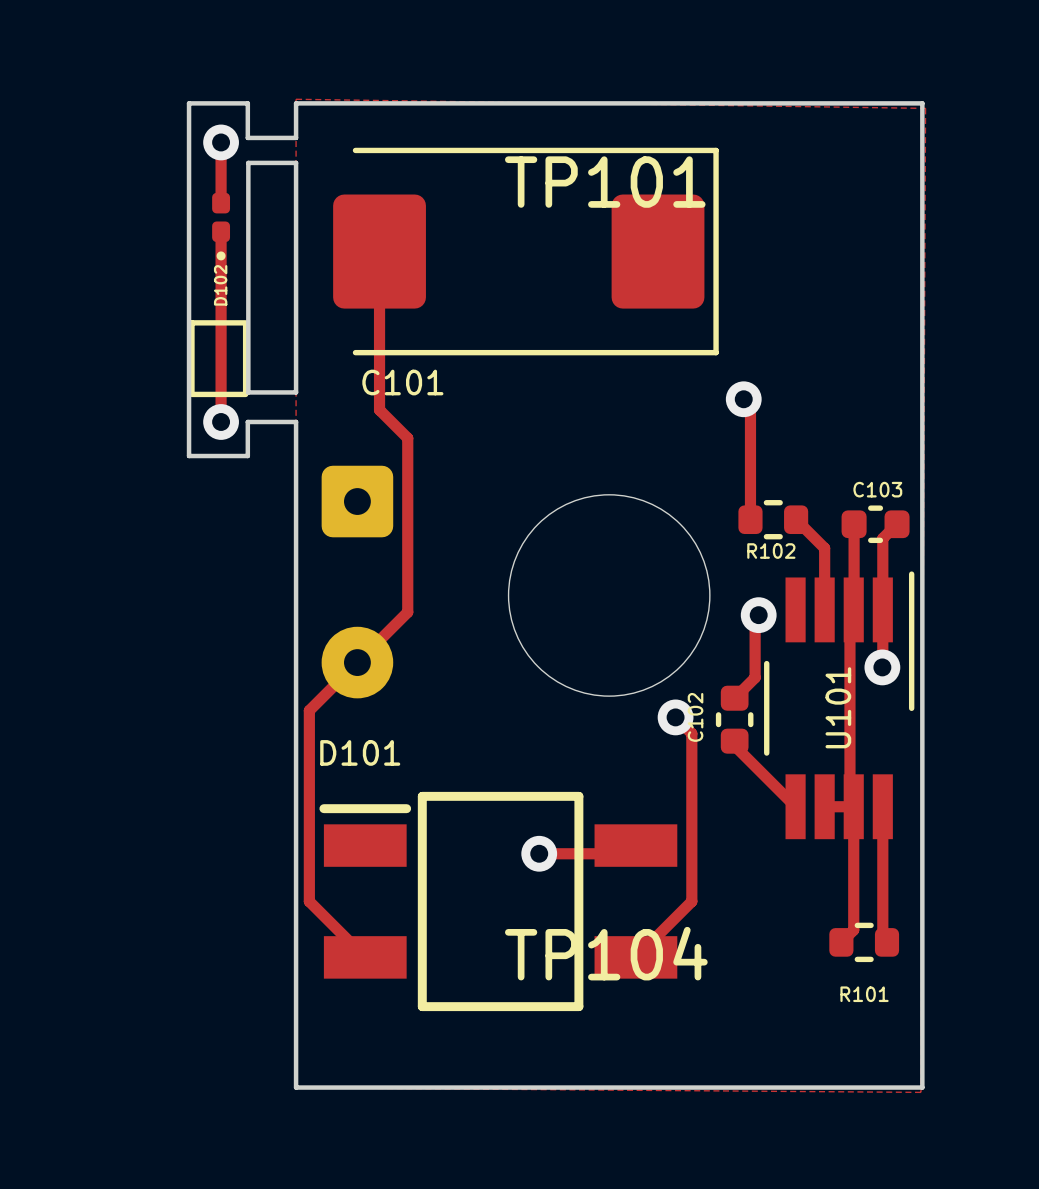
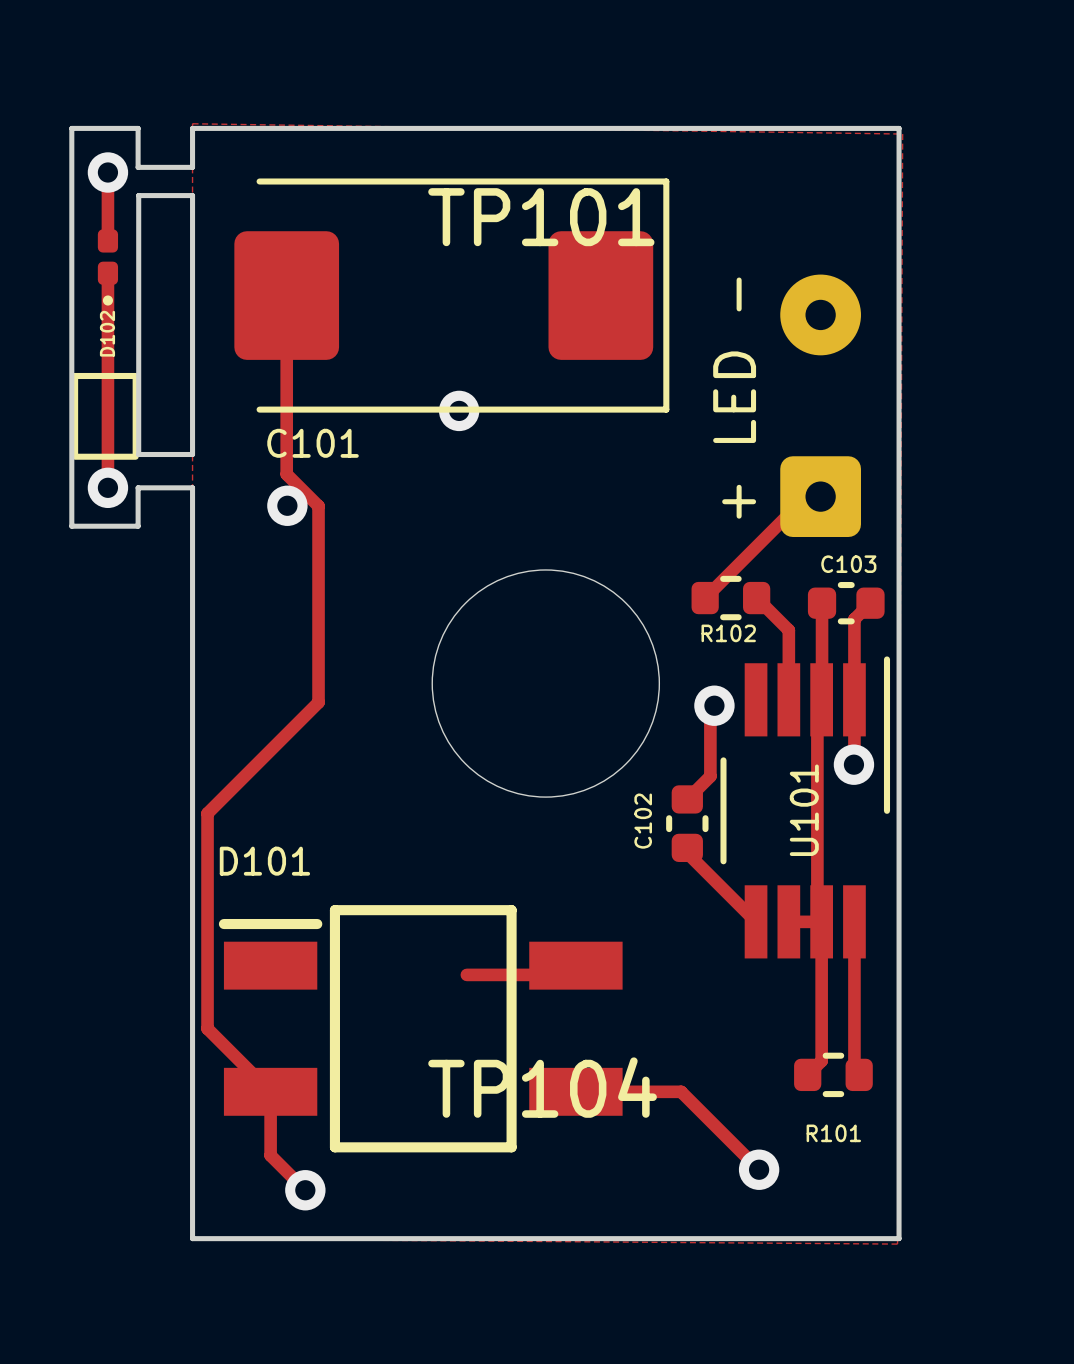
part: none -> + LED - (820, 405)
via: none -> (459, 410)
via: (743, 399) -> none
track: (750, 405) (750, 519) -> (820, 496) (806, 496) (705, 598)
via: none -> (287, 505)
part: (357, 582) -> none
track: (675, 717) (691, 733) (691, 901) (635, 957) -> (759, 1169) (681, 1091) (575, 1091)
via: (675, 717) -> none
via: (539, 853) -> none
track: none -> (270, 1091) (270, 1155) (305, 1190)
via: none -> (759, 1169)
via: none -> (305, 1190)

